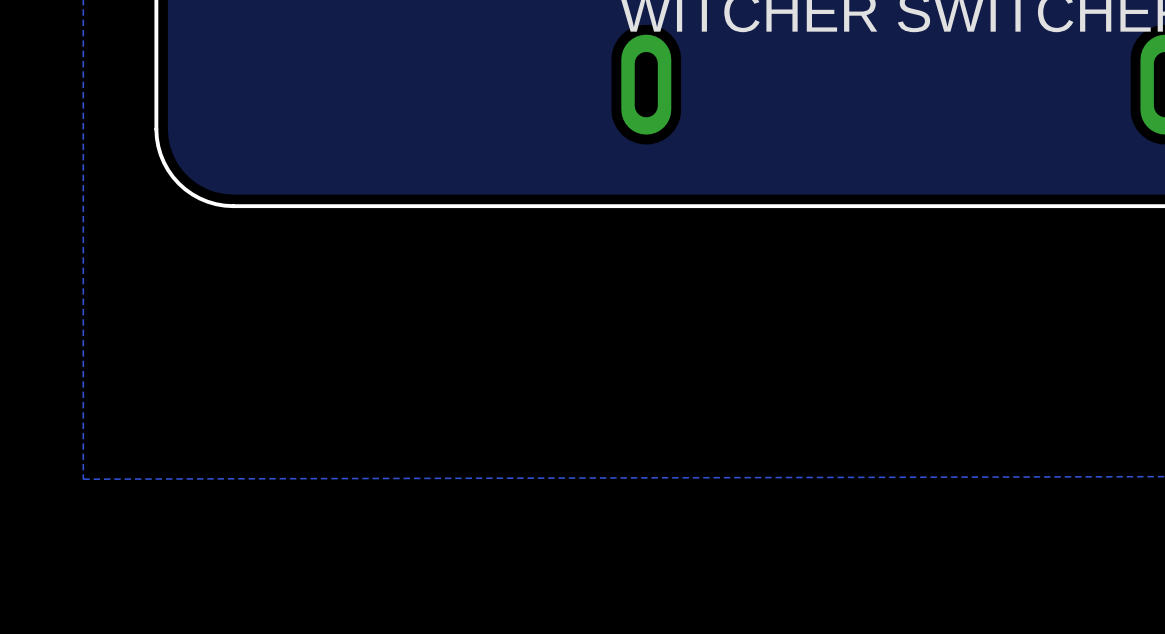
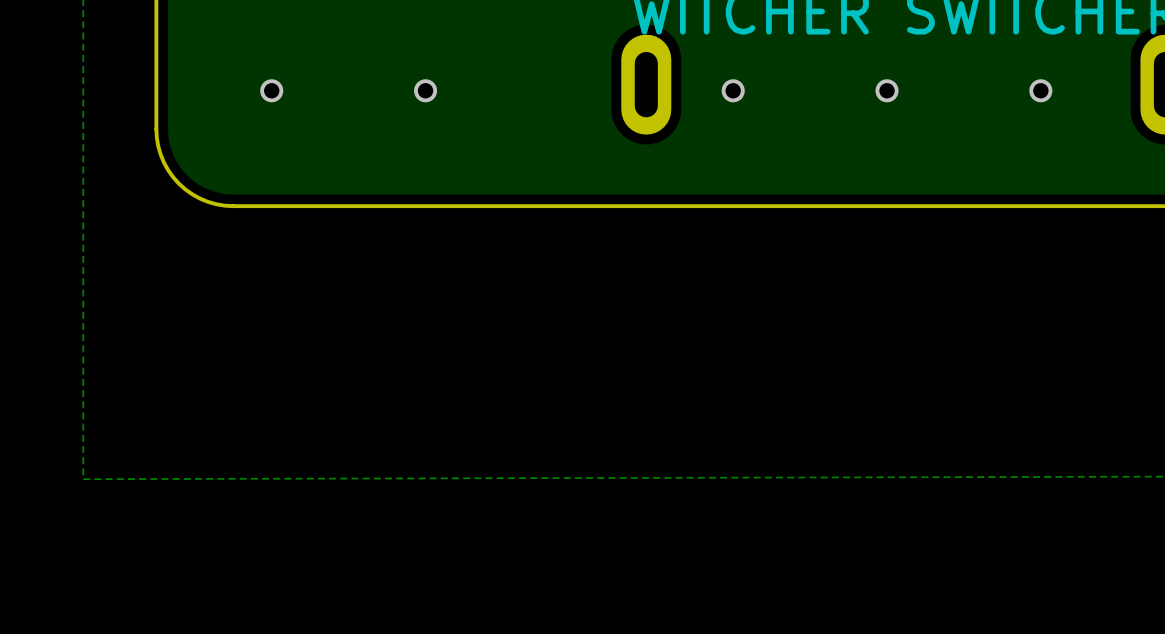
via: none -> (271, 90)
via: none -> (425, 90)
via: none -> (733, 90)
via: none -> (887, 90)
via: none -> (1040, 90)

